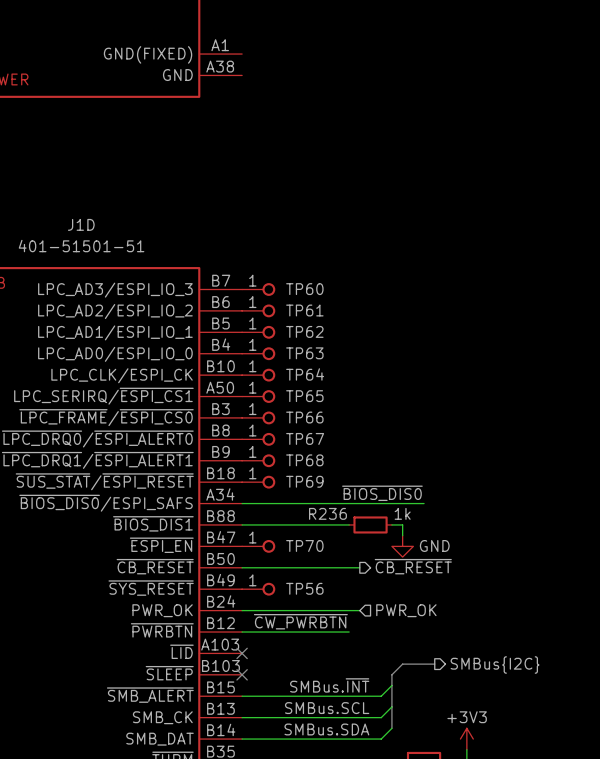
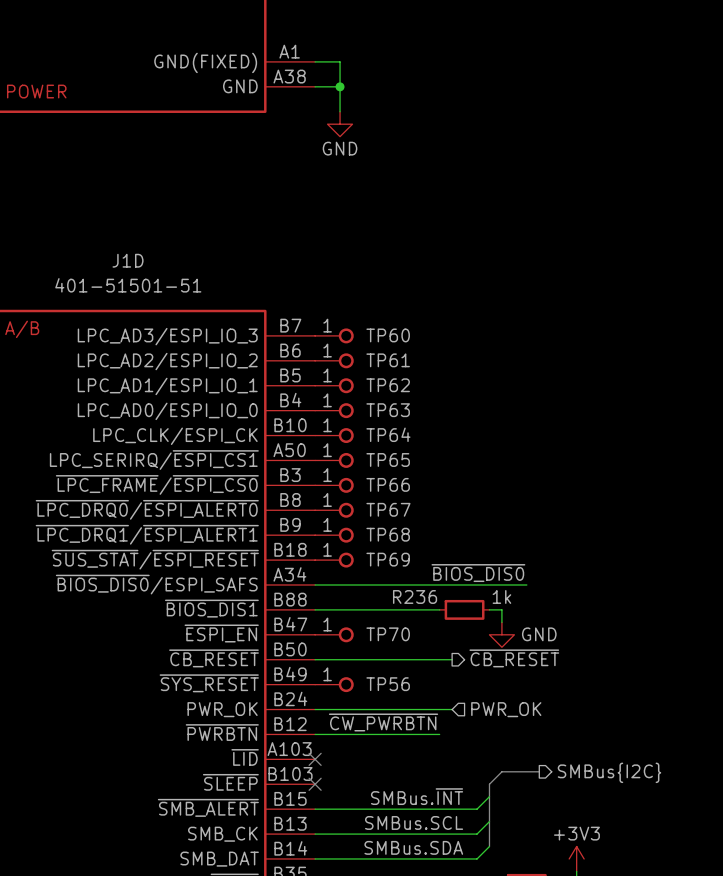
wire: none -> (315, 61) (340, 61) (340, 111)
wire: none -> (315, 86) (340, 86)
junction: none -> (340, 86)
power symbol: none -> GND (340, 124)

